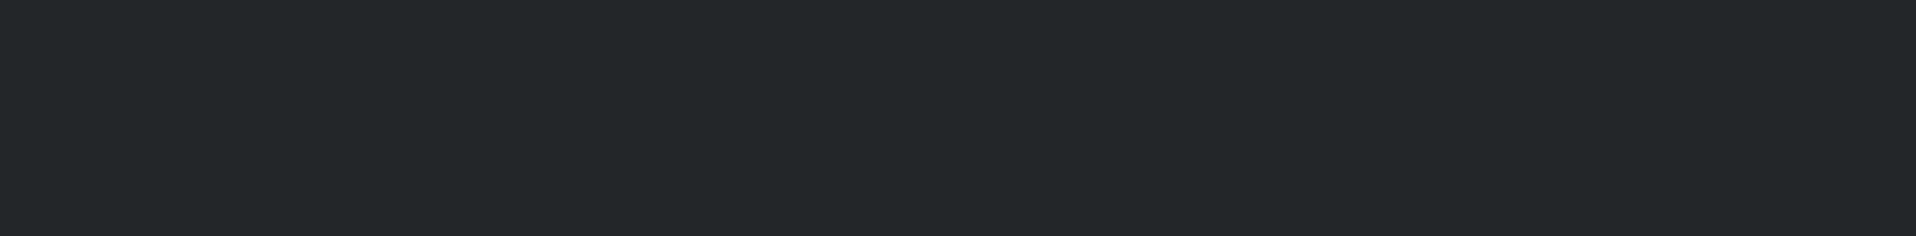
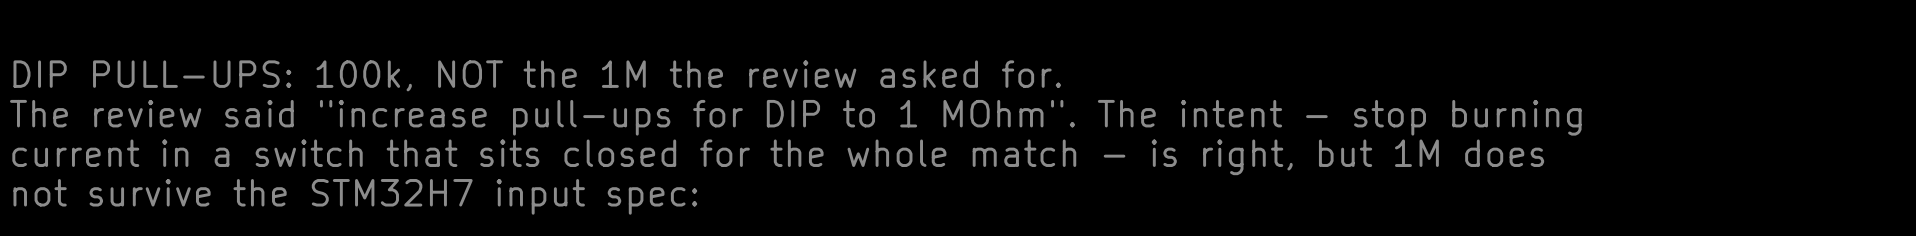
text: none -> DIP PULL-UPS: 100k, NOT the 1M the review asked for. (537, 75)
text: none -> The review said "increase pull-ups for DIP to 1 MOhm". The intent - stop burning (795, 117)
text: none -> current in a switch that sits closed for the whole match - is right, but 1M does (778, 157)
text: none -> not survive the STM32H7 input spec: (355, 196)

